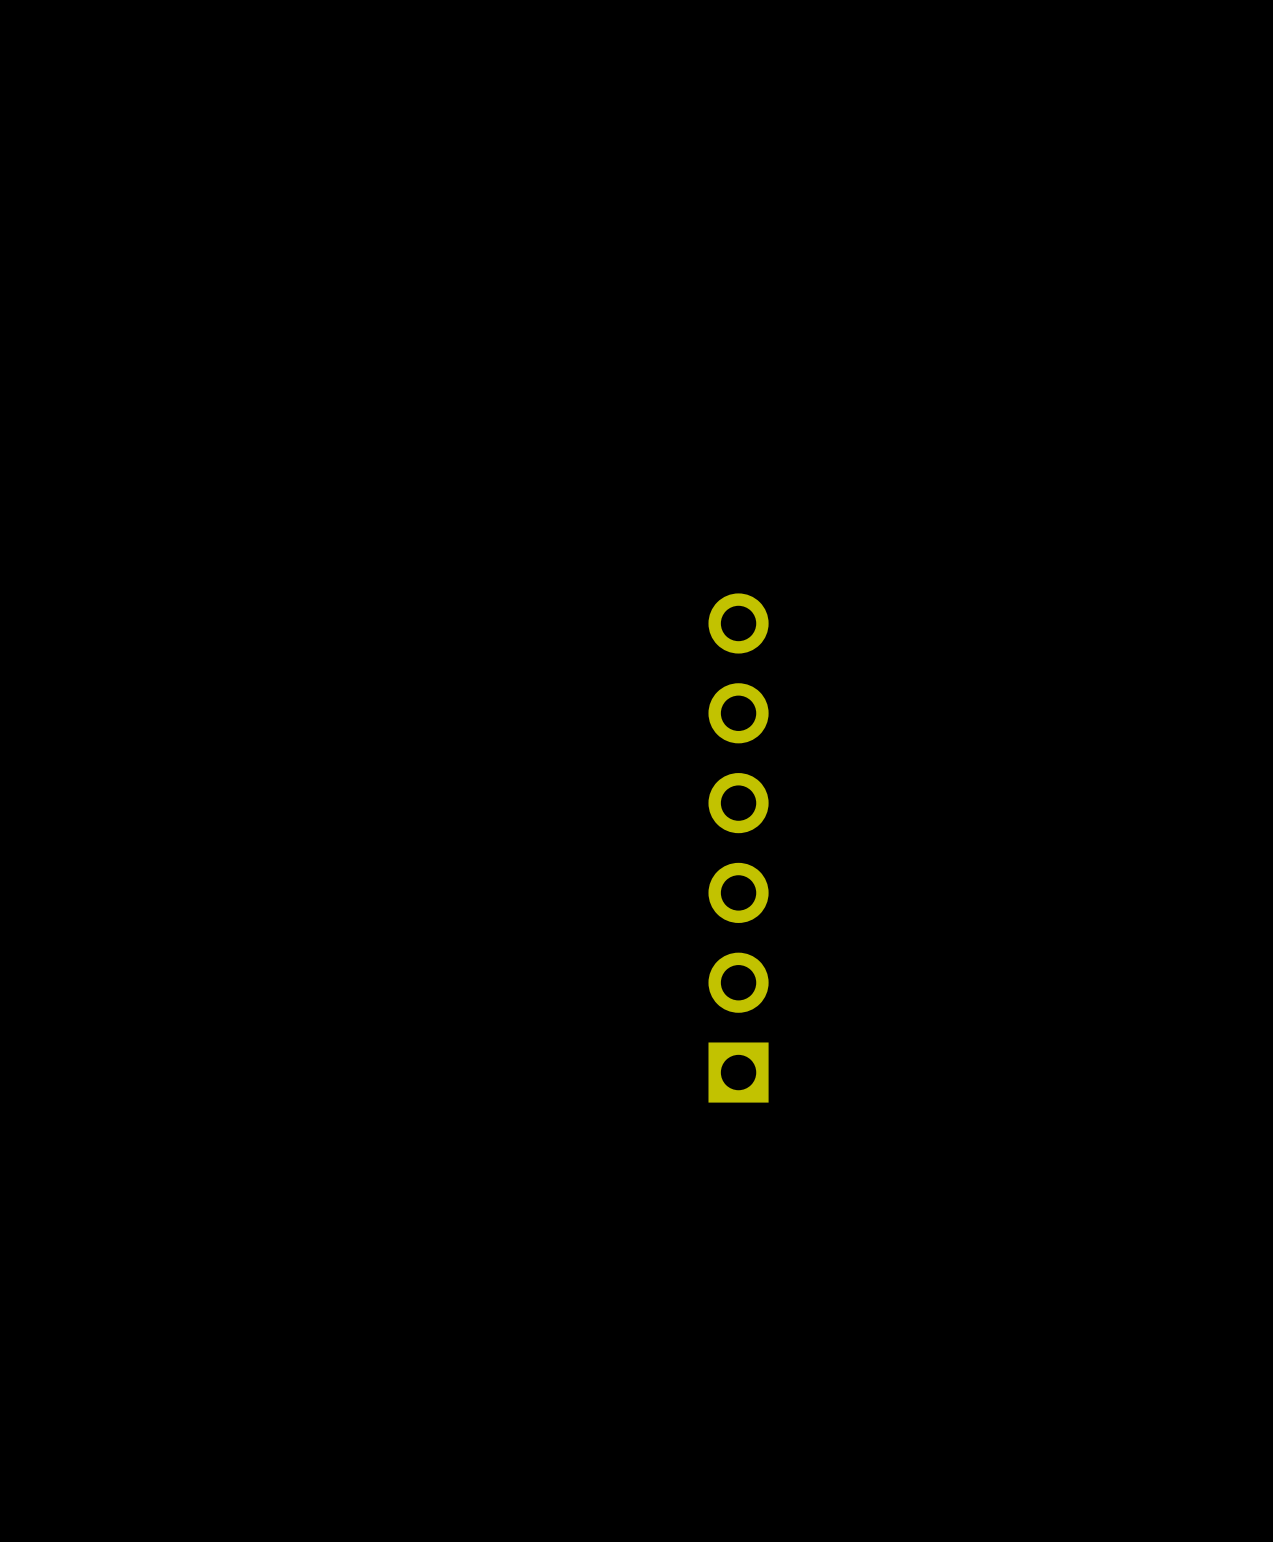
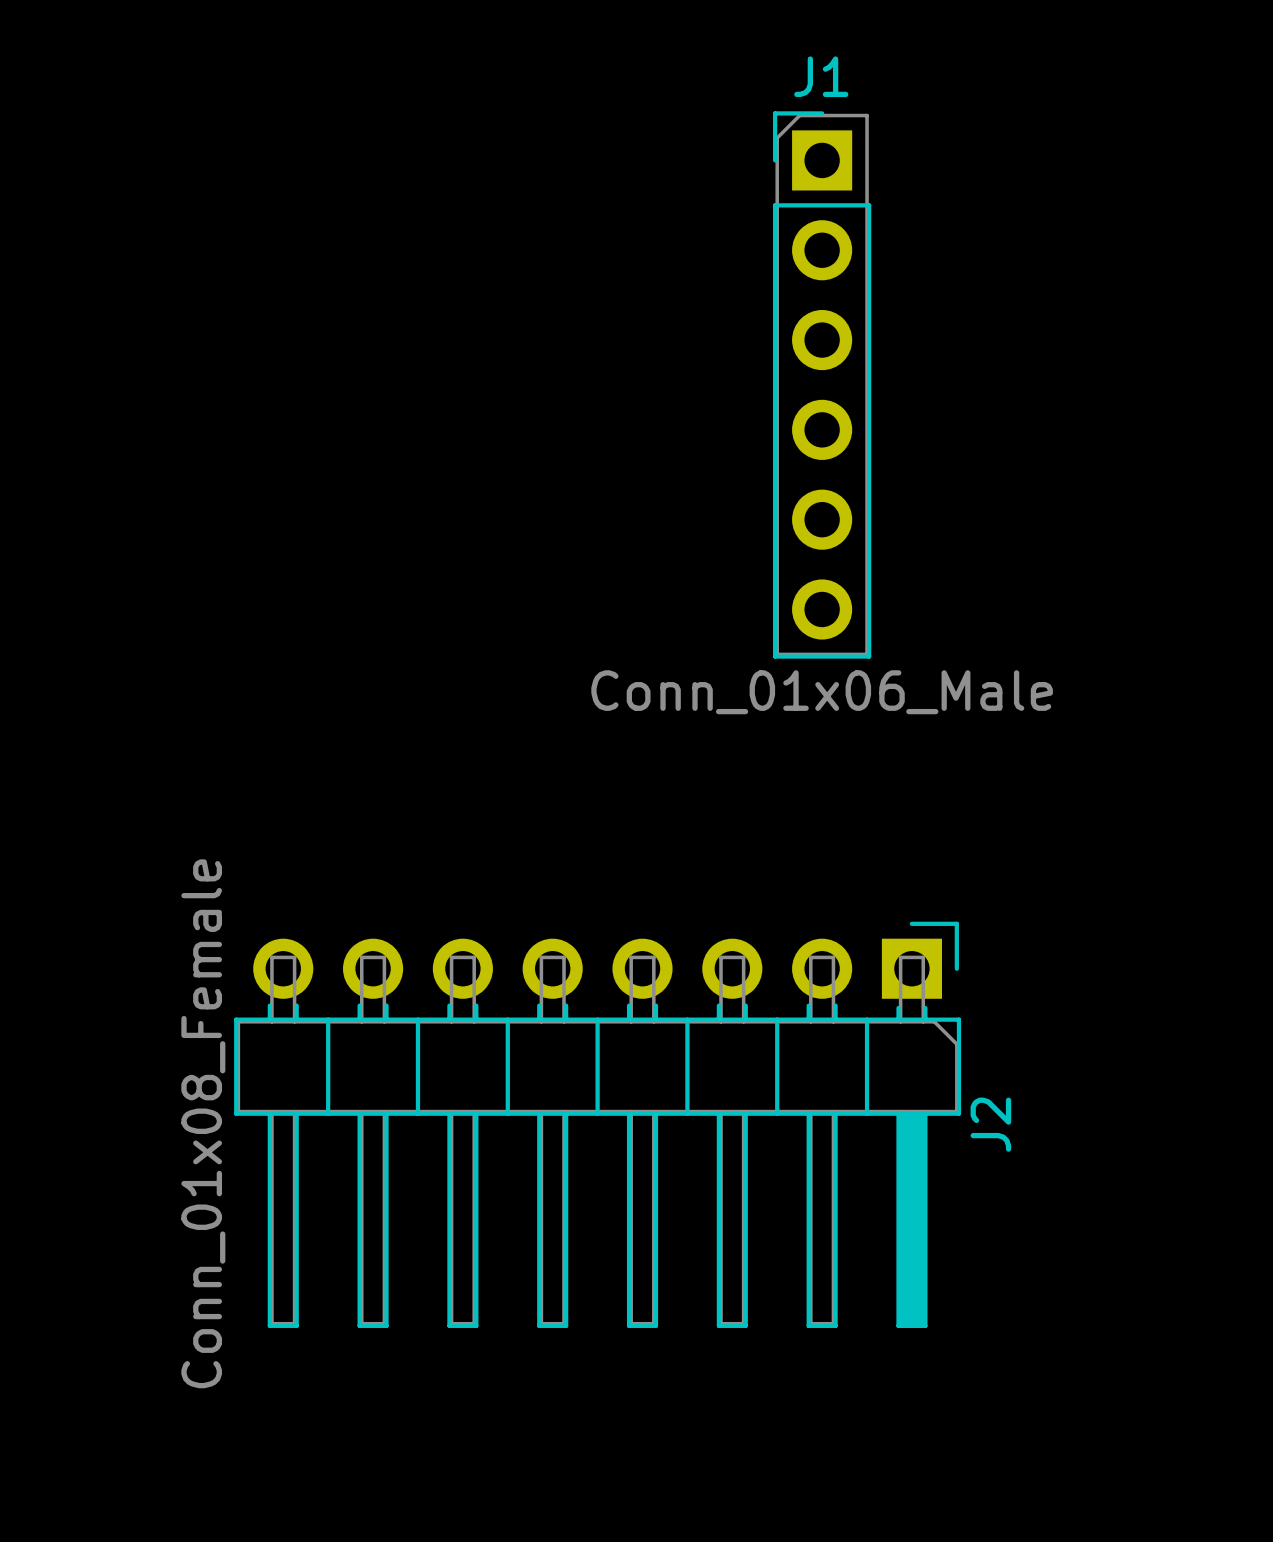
J1 side: bottom (738, 848) -> top (822, 384)
J2: none -> Conn_01x08_Female (597, 1124)

